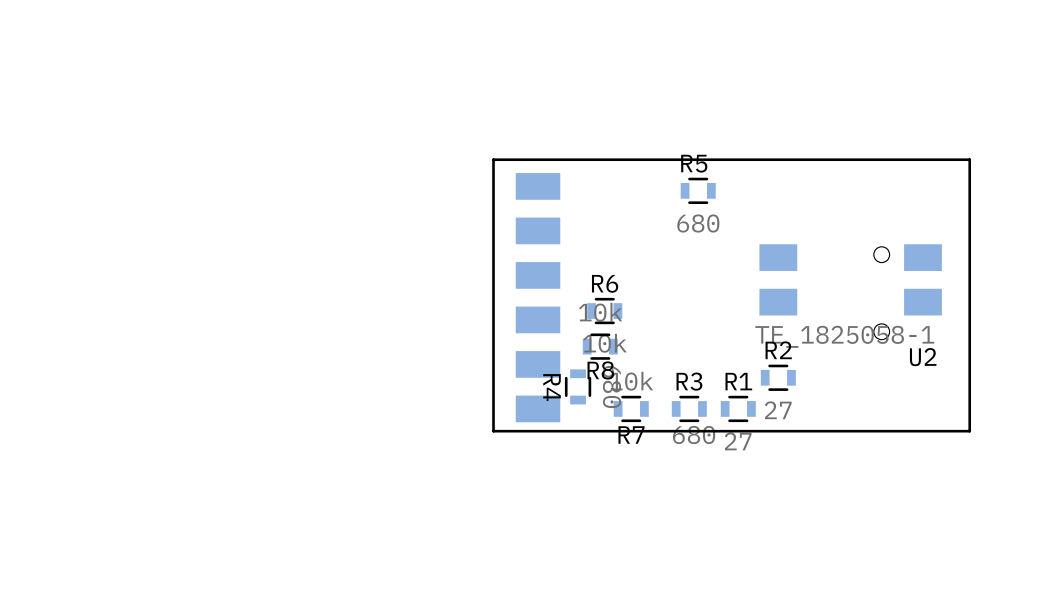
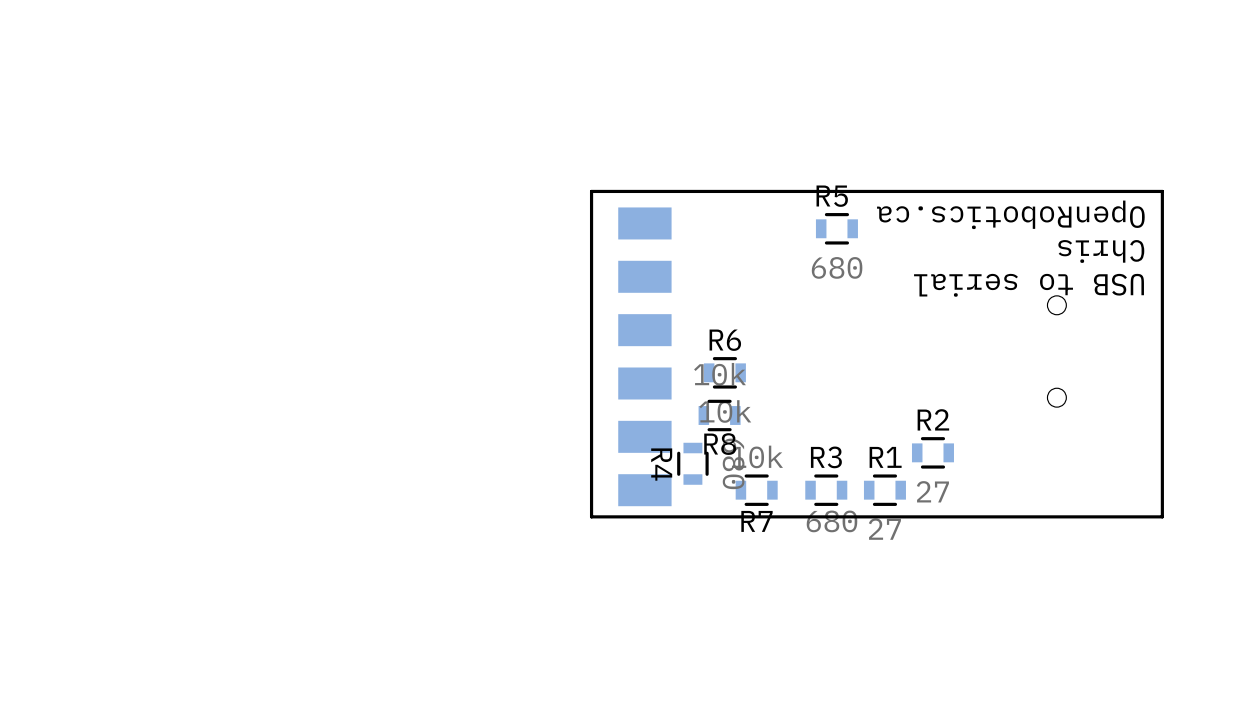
text: none -> OpenRobotics.ca (1010, 214)
text: none -> Chris (1101, 251)
text: none -> USB to serial (1029, 285)
U2: TE_1825058-1 (850, 279) -> none

